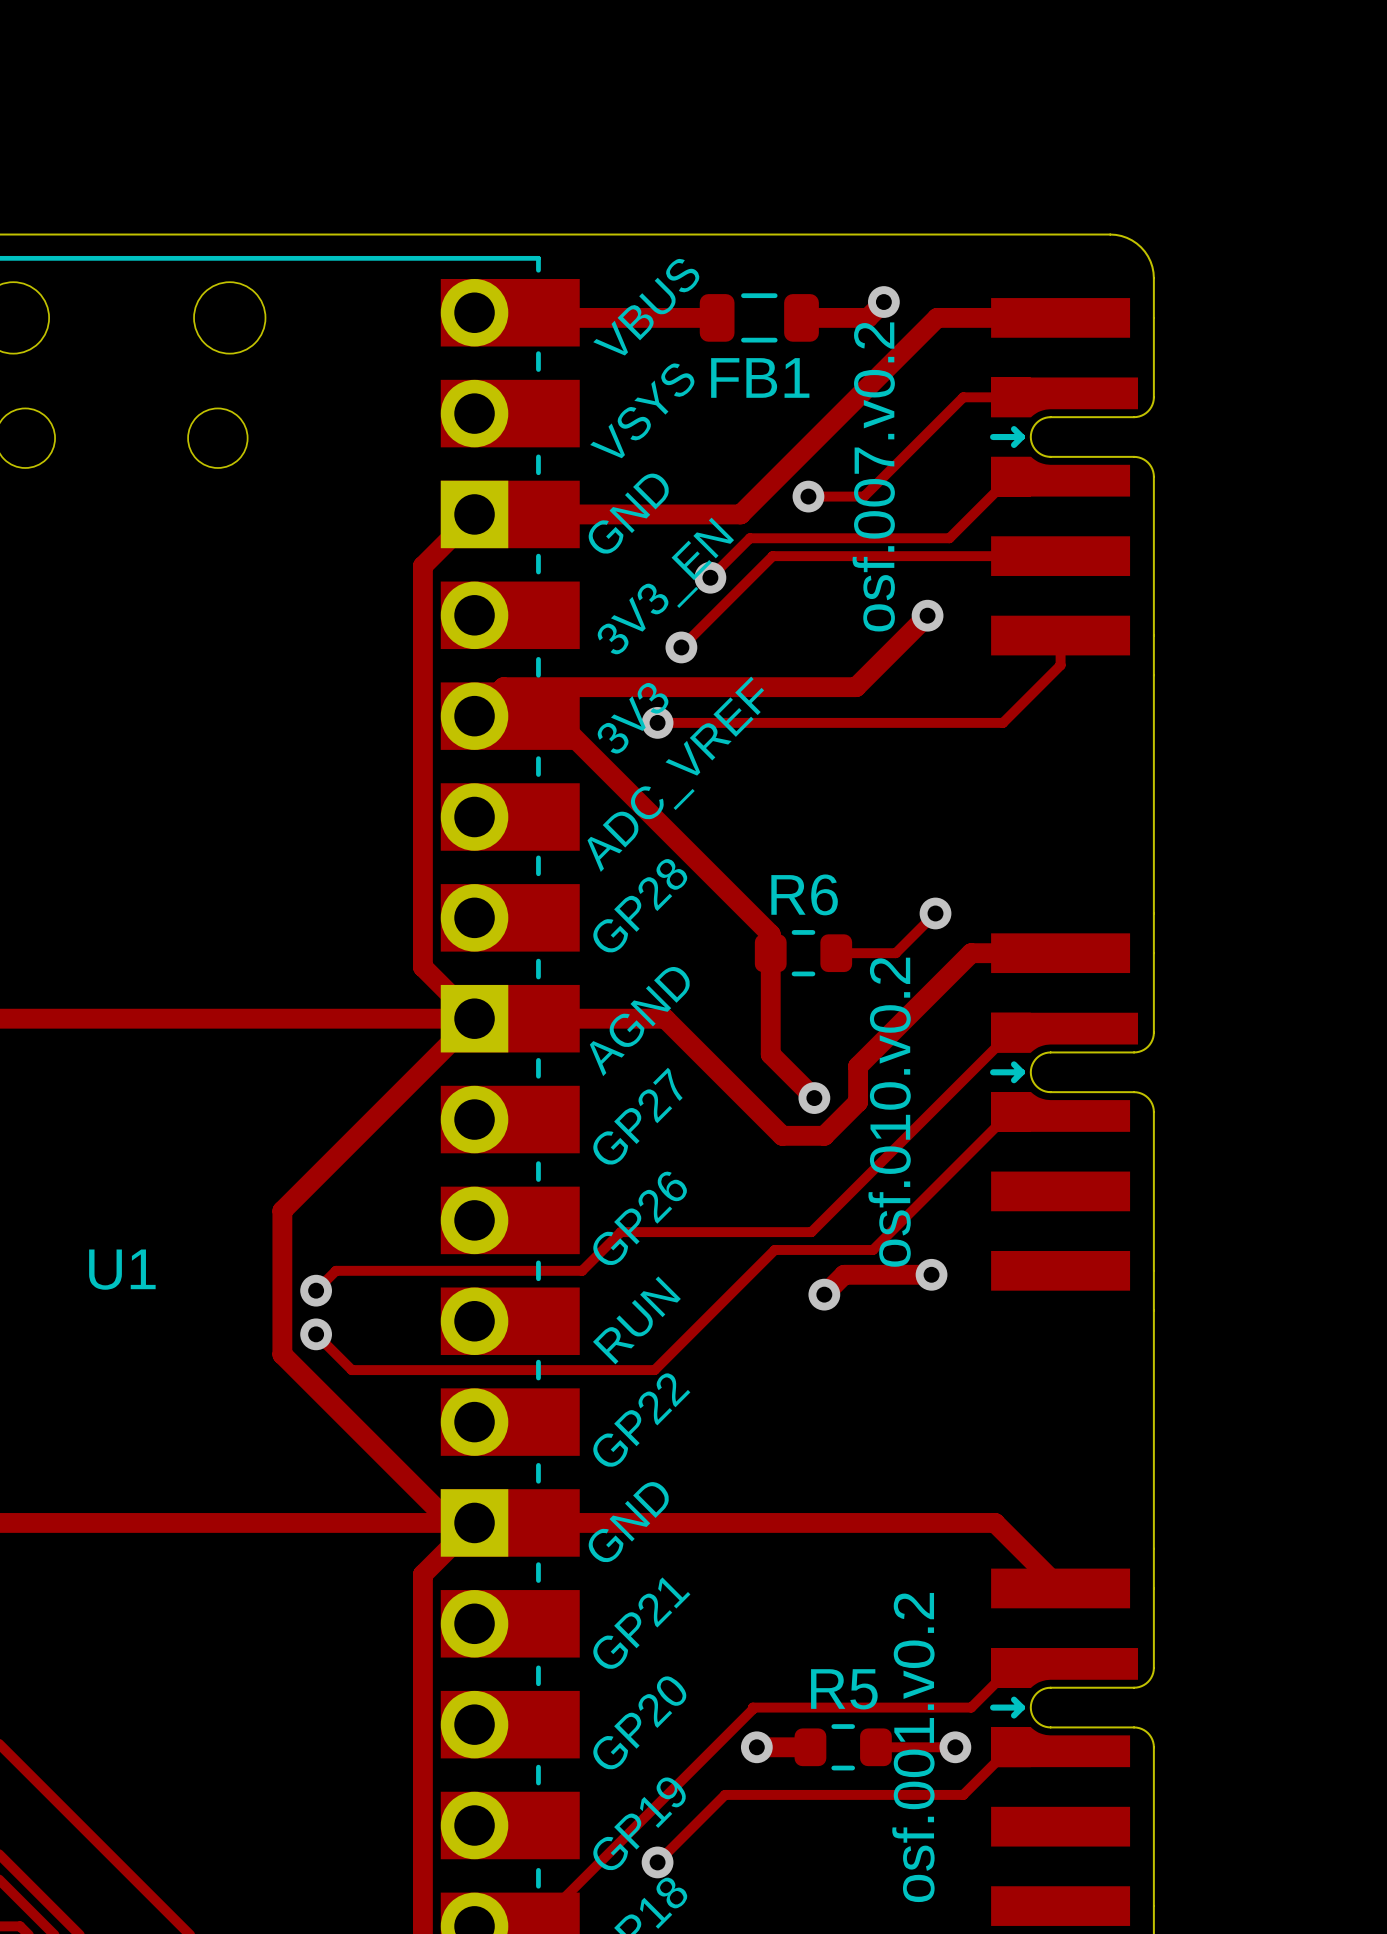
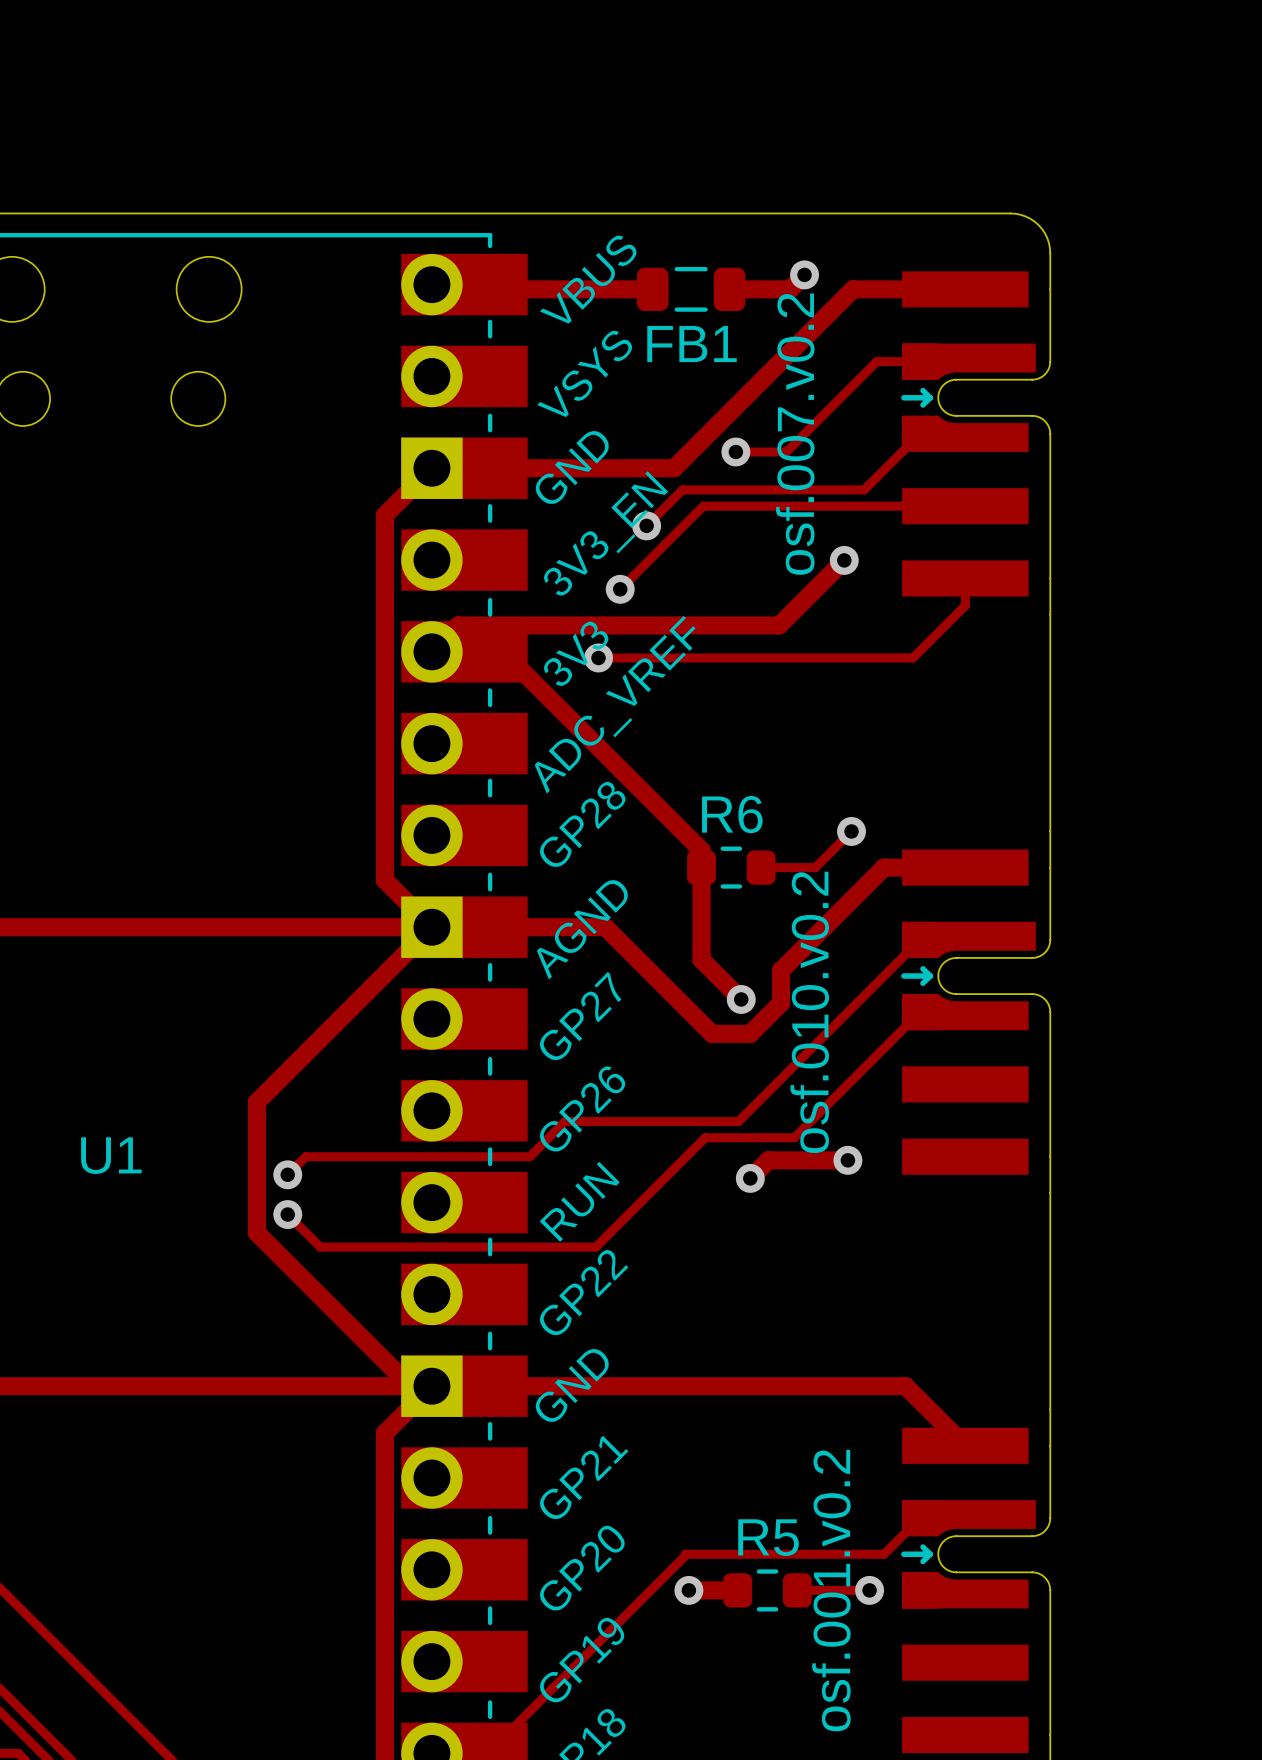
track: (1010, 1747) (963, 1794) (725, 1794) (657, 1862) -> none
via: (657, 1862) -> none

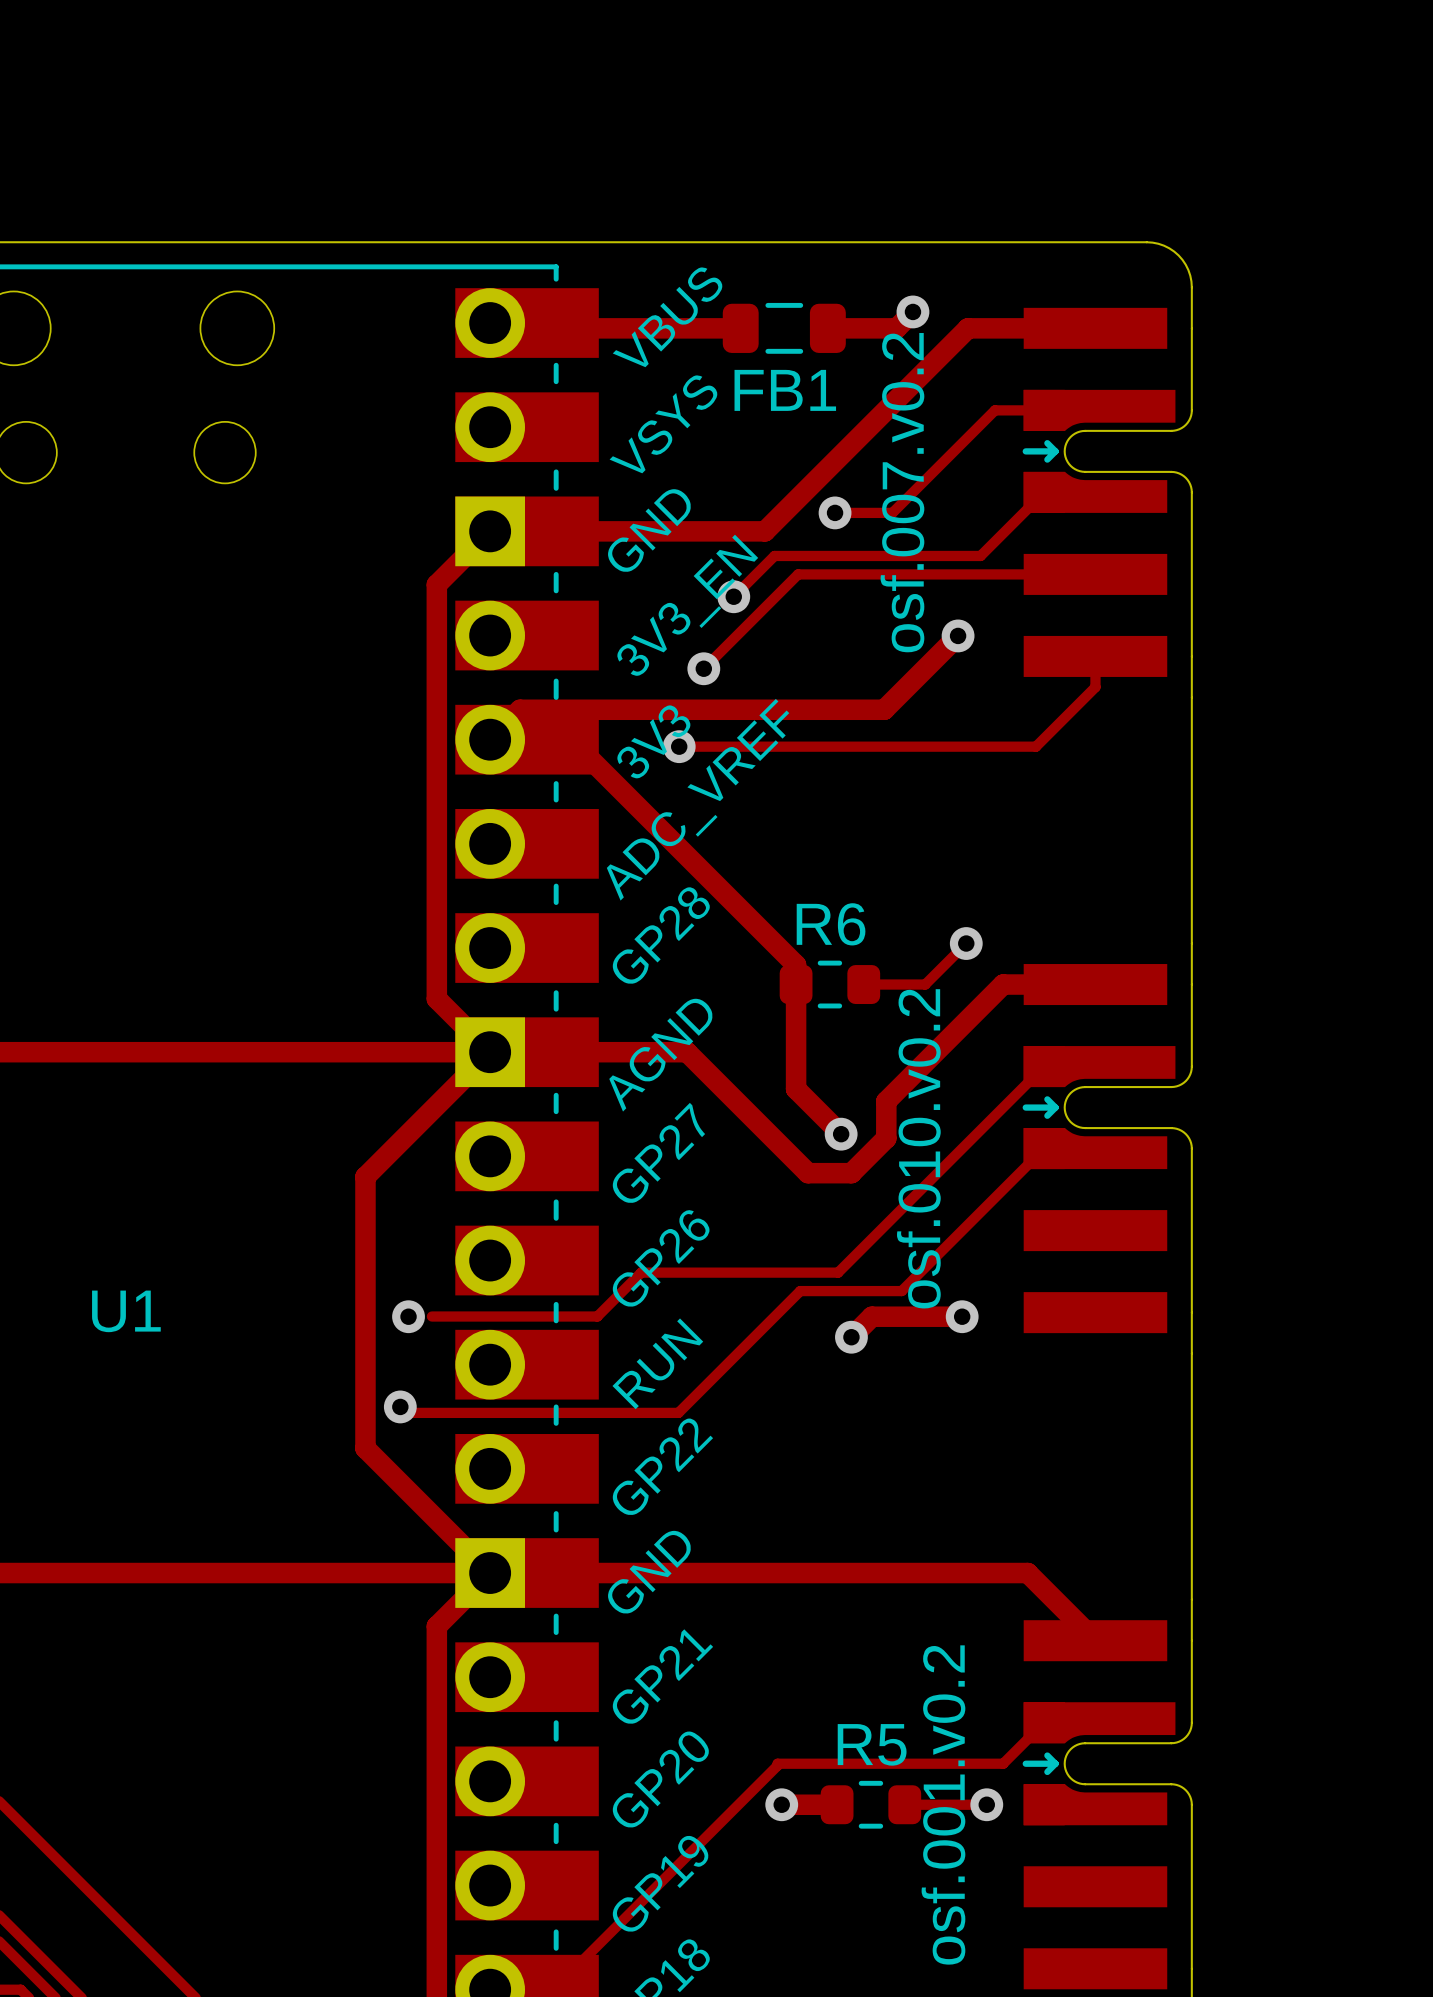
track: (322, 1037) (257, 1102) (257, 1232) (410, 1386) -> (365, 1176) (365, 1448) (490, 1573)
track: (529, 1156) (305, 1156) (287, 1174) -> (601, 1312) (597, 1316) (431, 1316)
via: none -> (408, 1316)
via: (287, 1174) -> none
track: (287, 1214) (320, 1247) (595, 1247) (597, 1245) -> (400, 1406) (406, 1412) (678, 1412)
via: (287, 1214) -> none
via: none -> (400, 1406)

